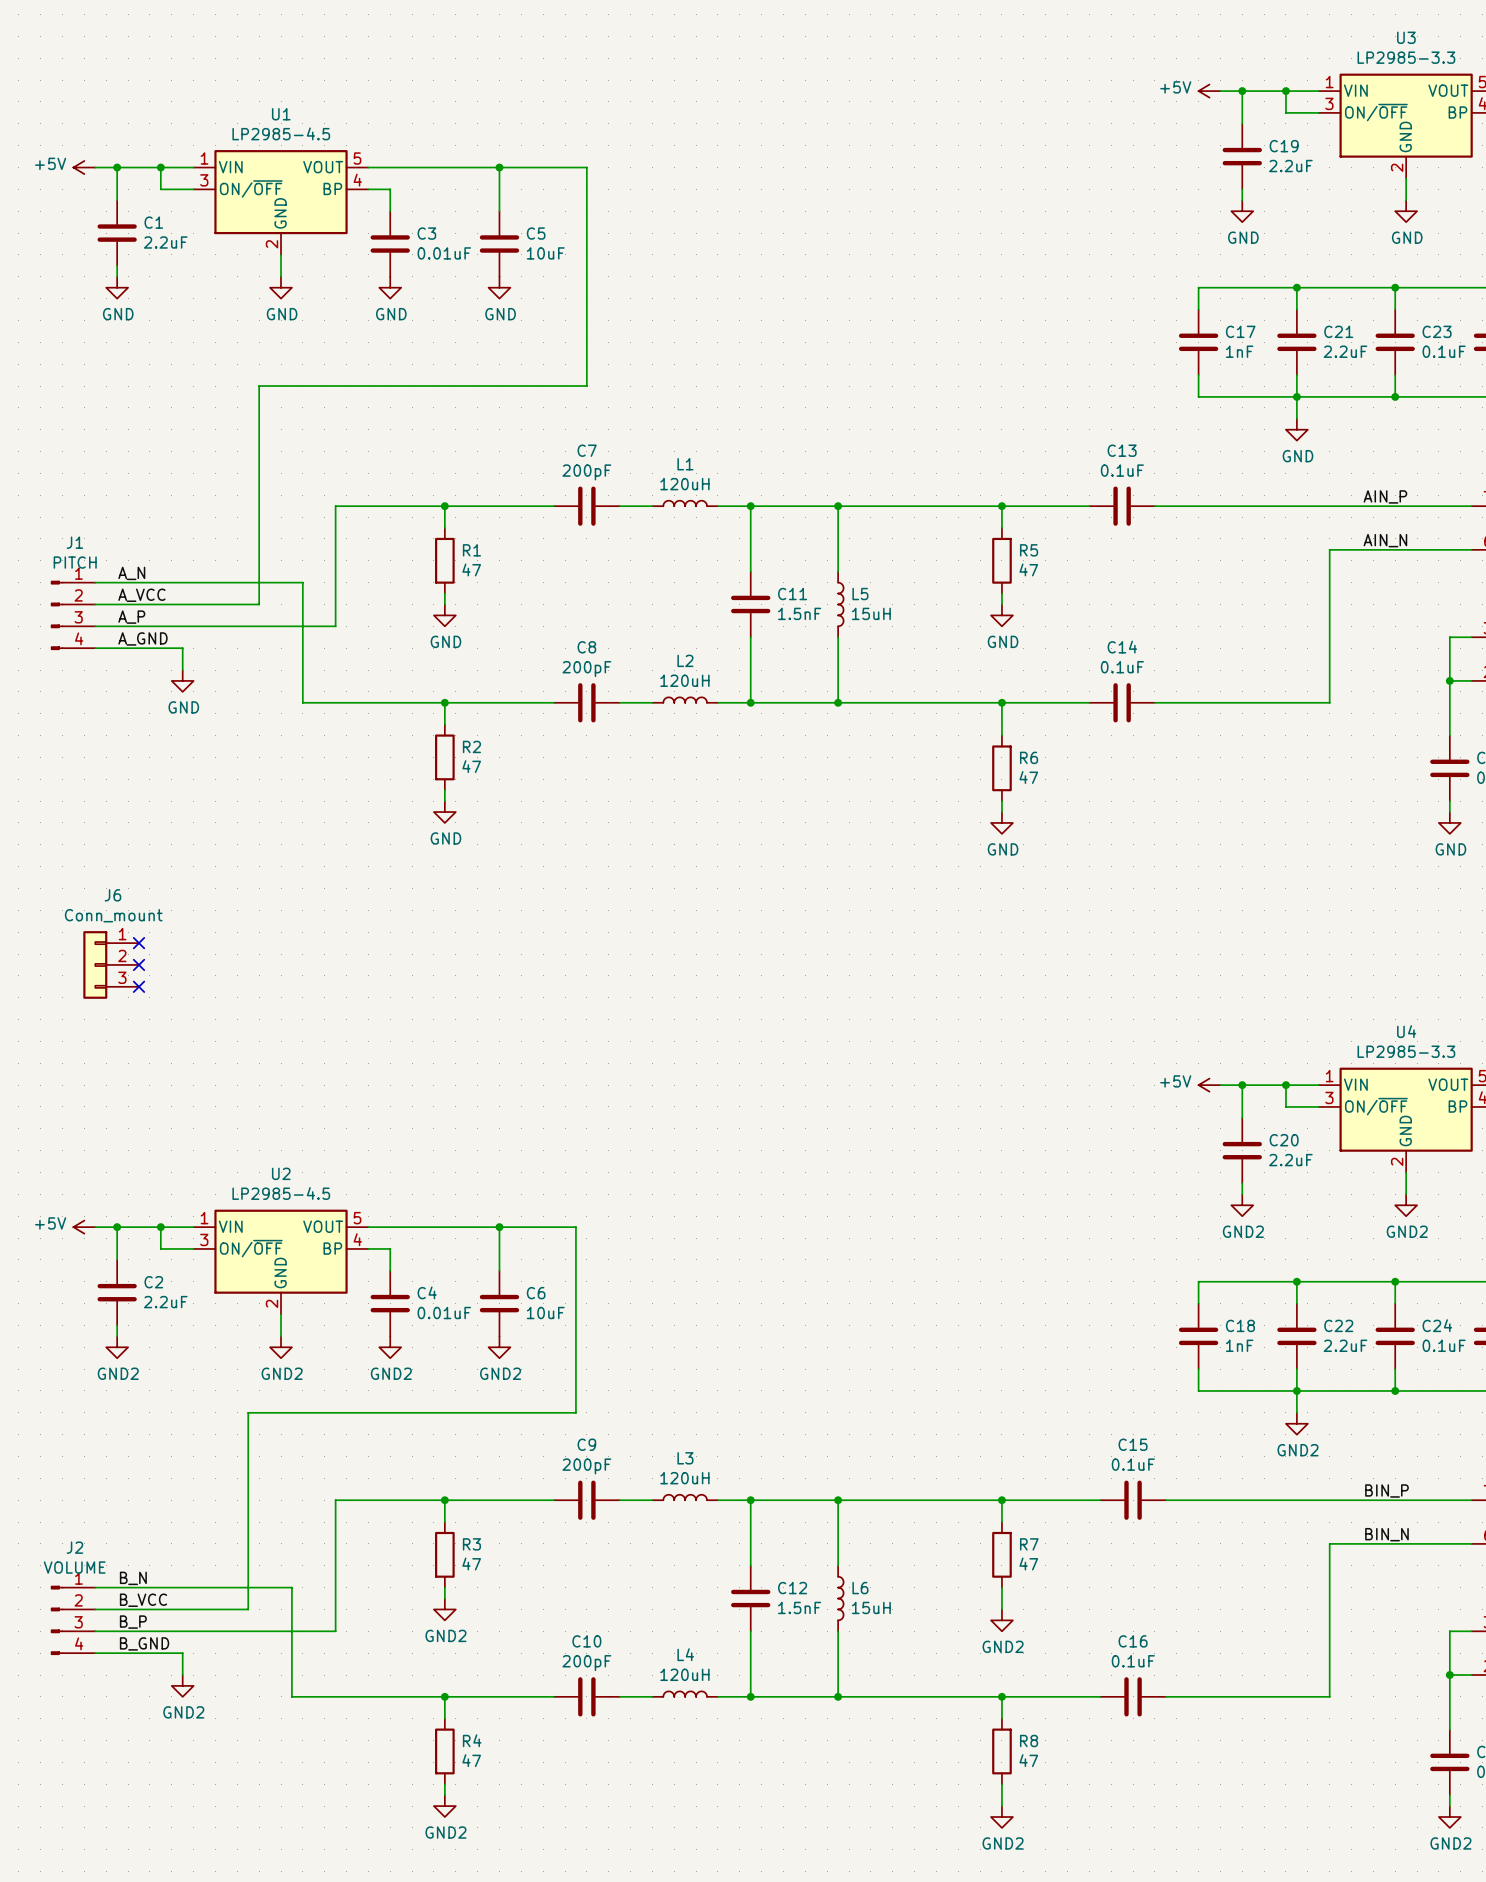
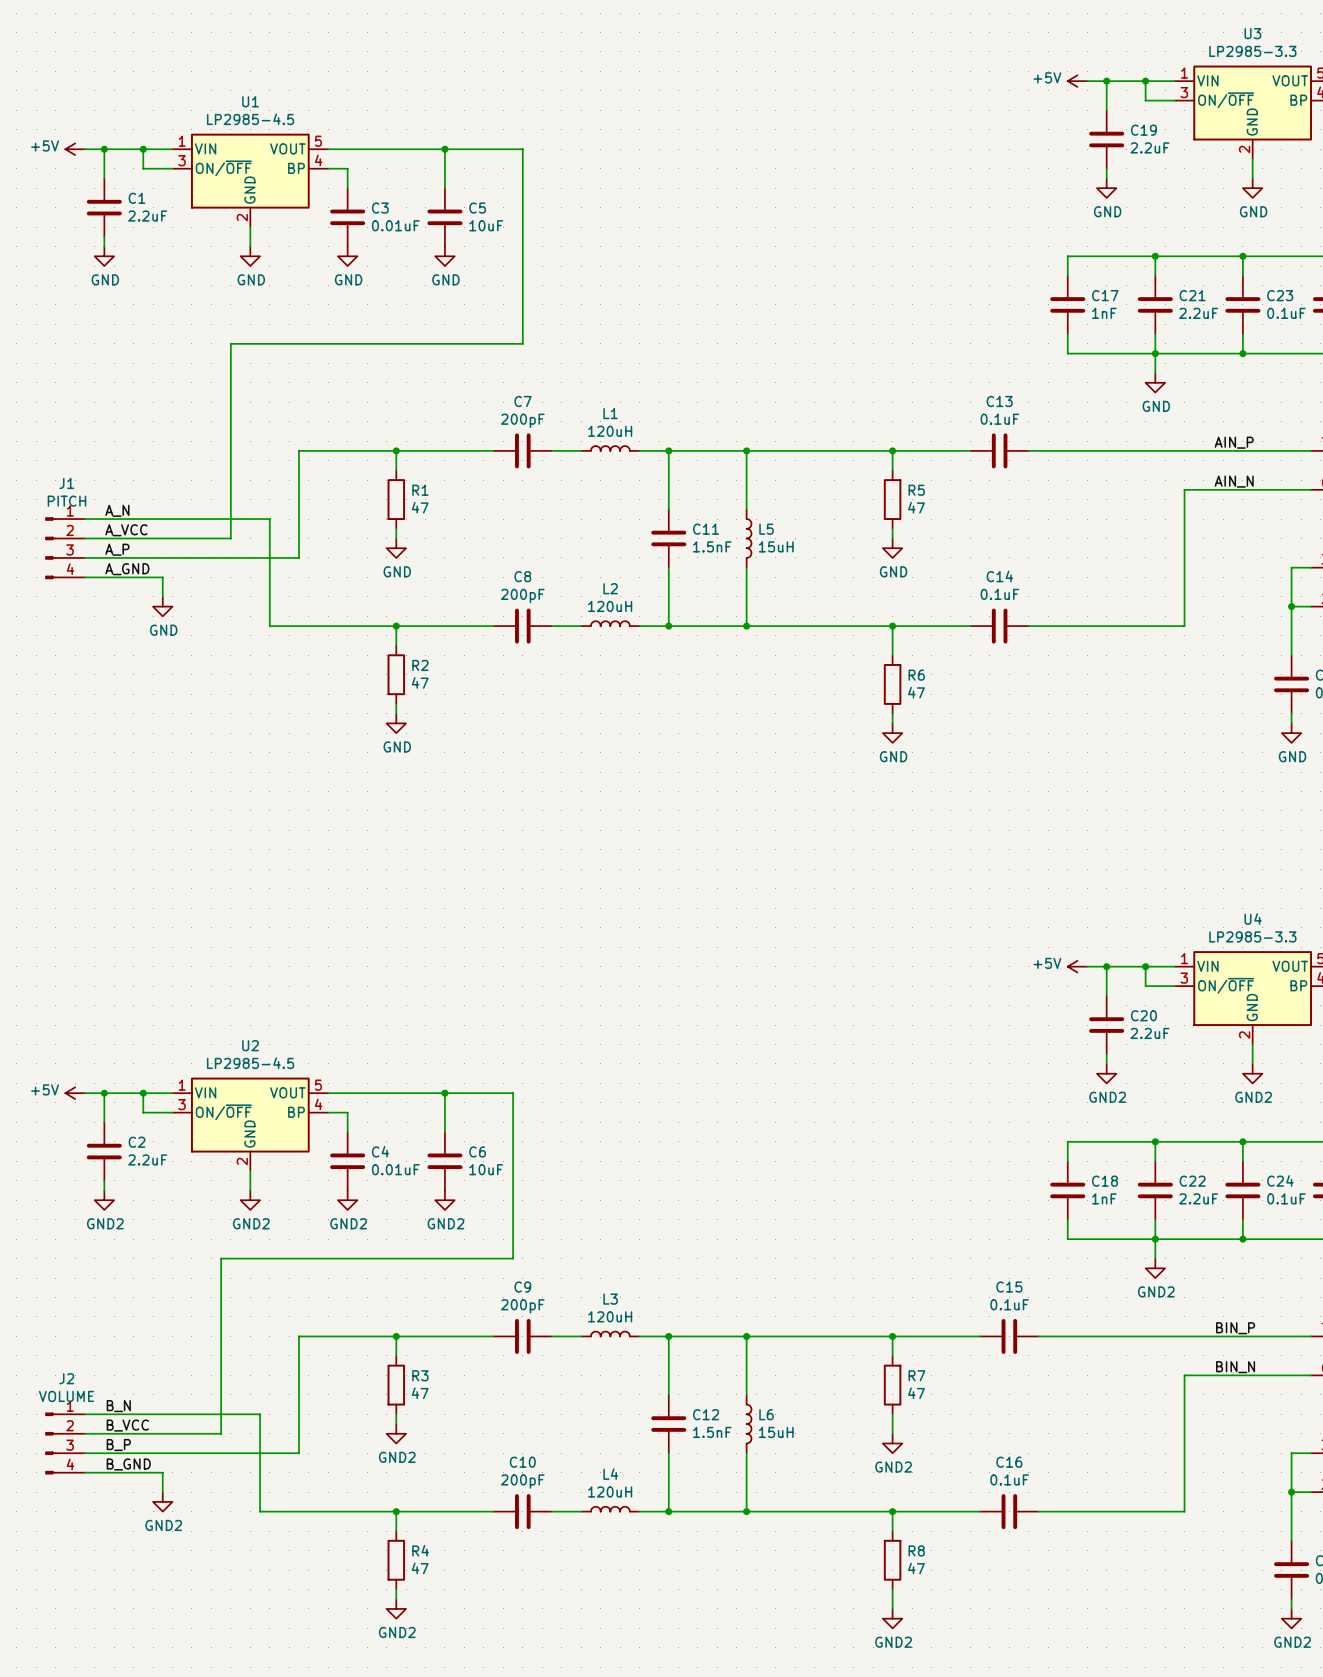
no-connect mark: (139, 943) -> none
J6: Conn_mount (111, 964) -> none
no-connect mark: (139, 964) -> none
no-connect mark: (139, 986) -> none

